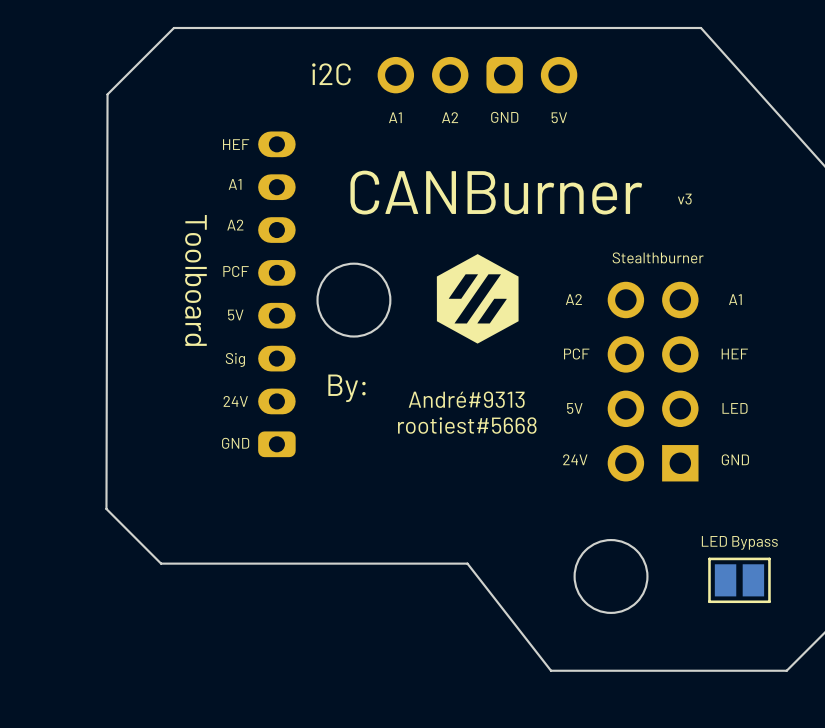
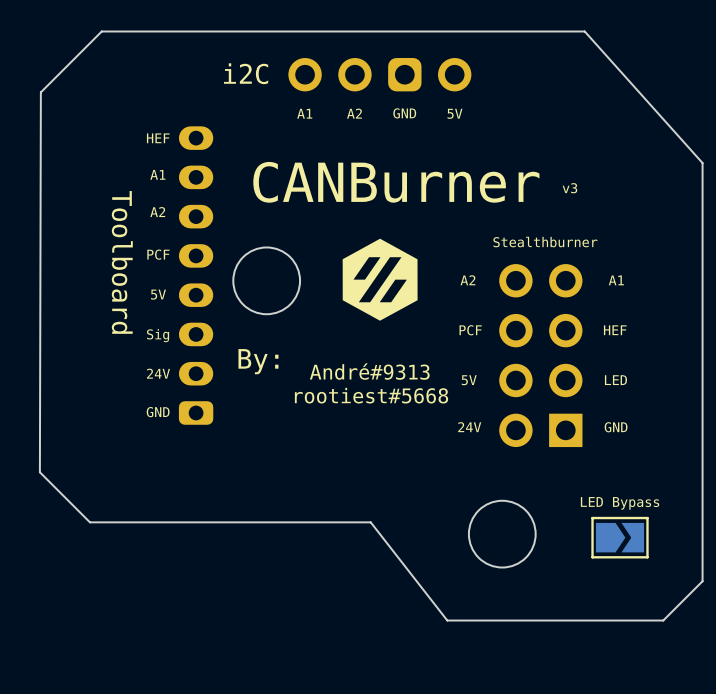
LED Bypass footprint: [708, 557, 771, 604] -> [591, 516, 649, 559]

